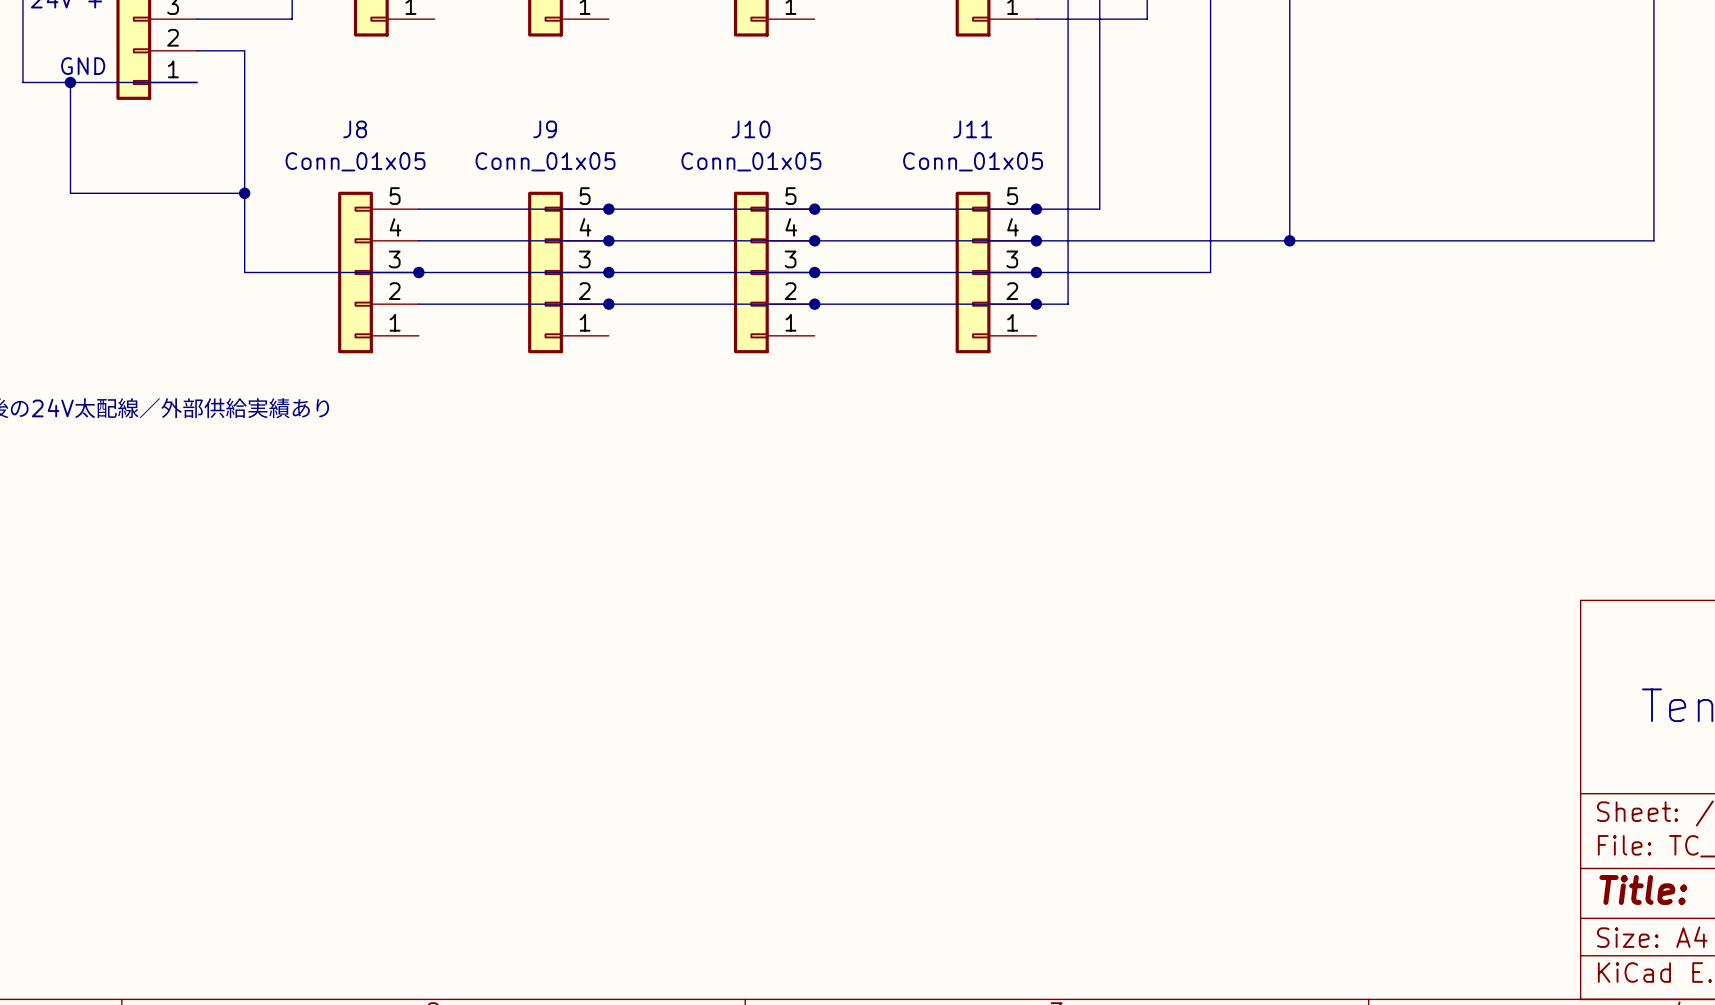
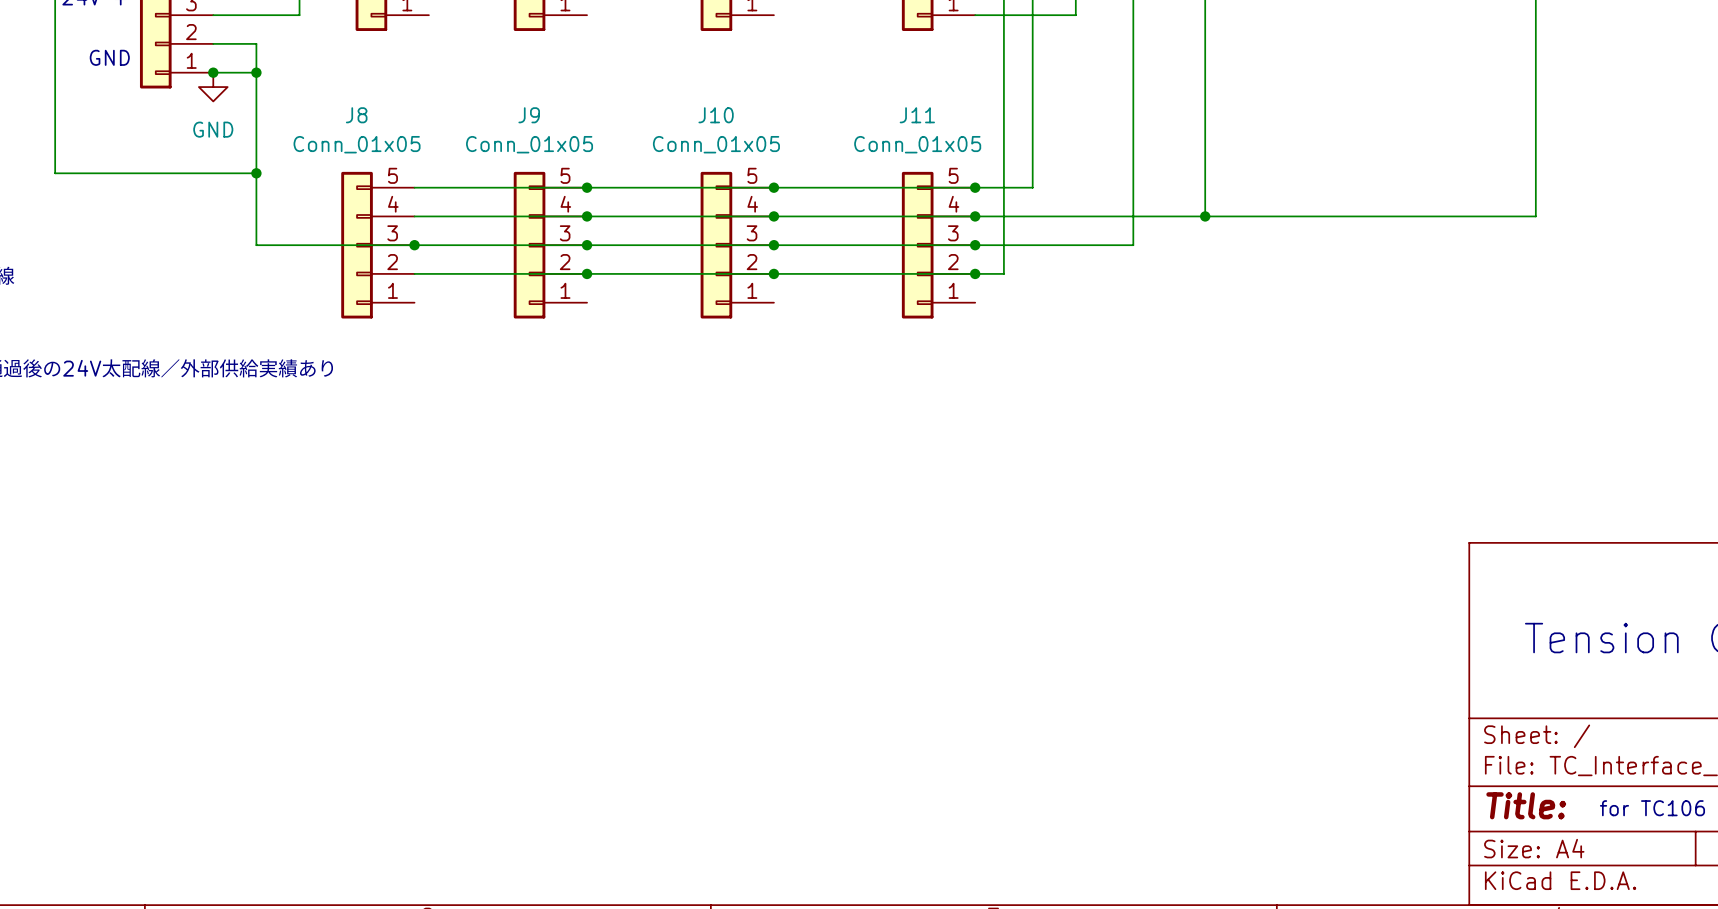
wire: (22, 82) (197, 82) -> (256, 72) (213, 72)
wire: (70, 82) (70, 193) -> (55, 72) (55, 173) (98, 173)
junction: (70, 82) -> none
junction: none -> (213, 72)
junction: none -> (256, 72)
power symbol: none -> GND (213, 87)

